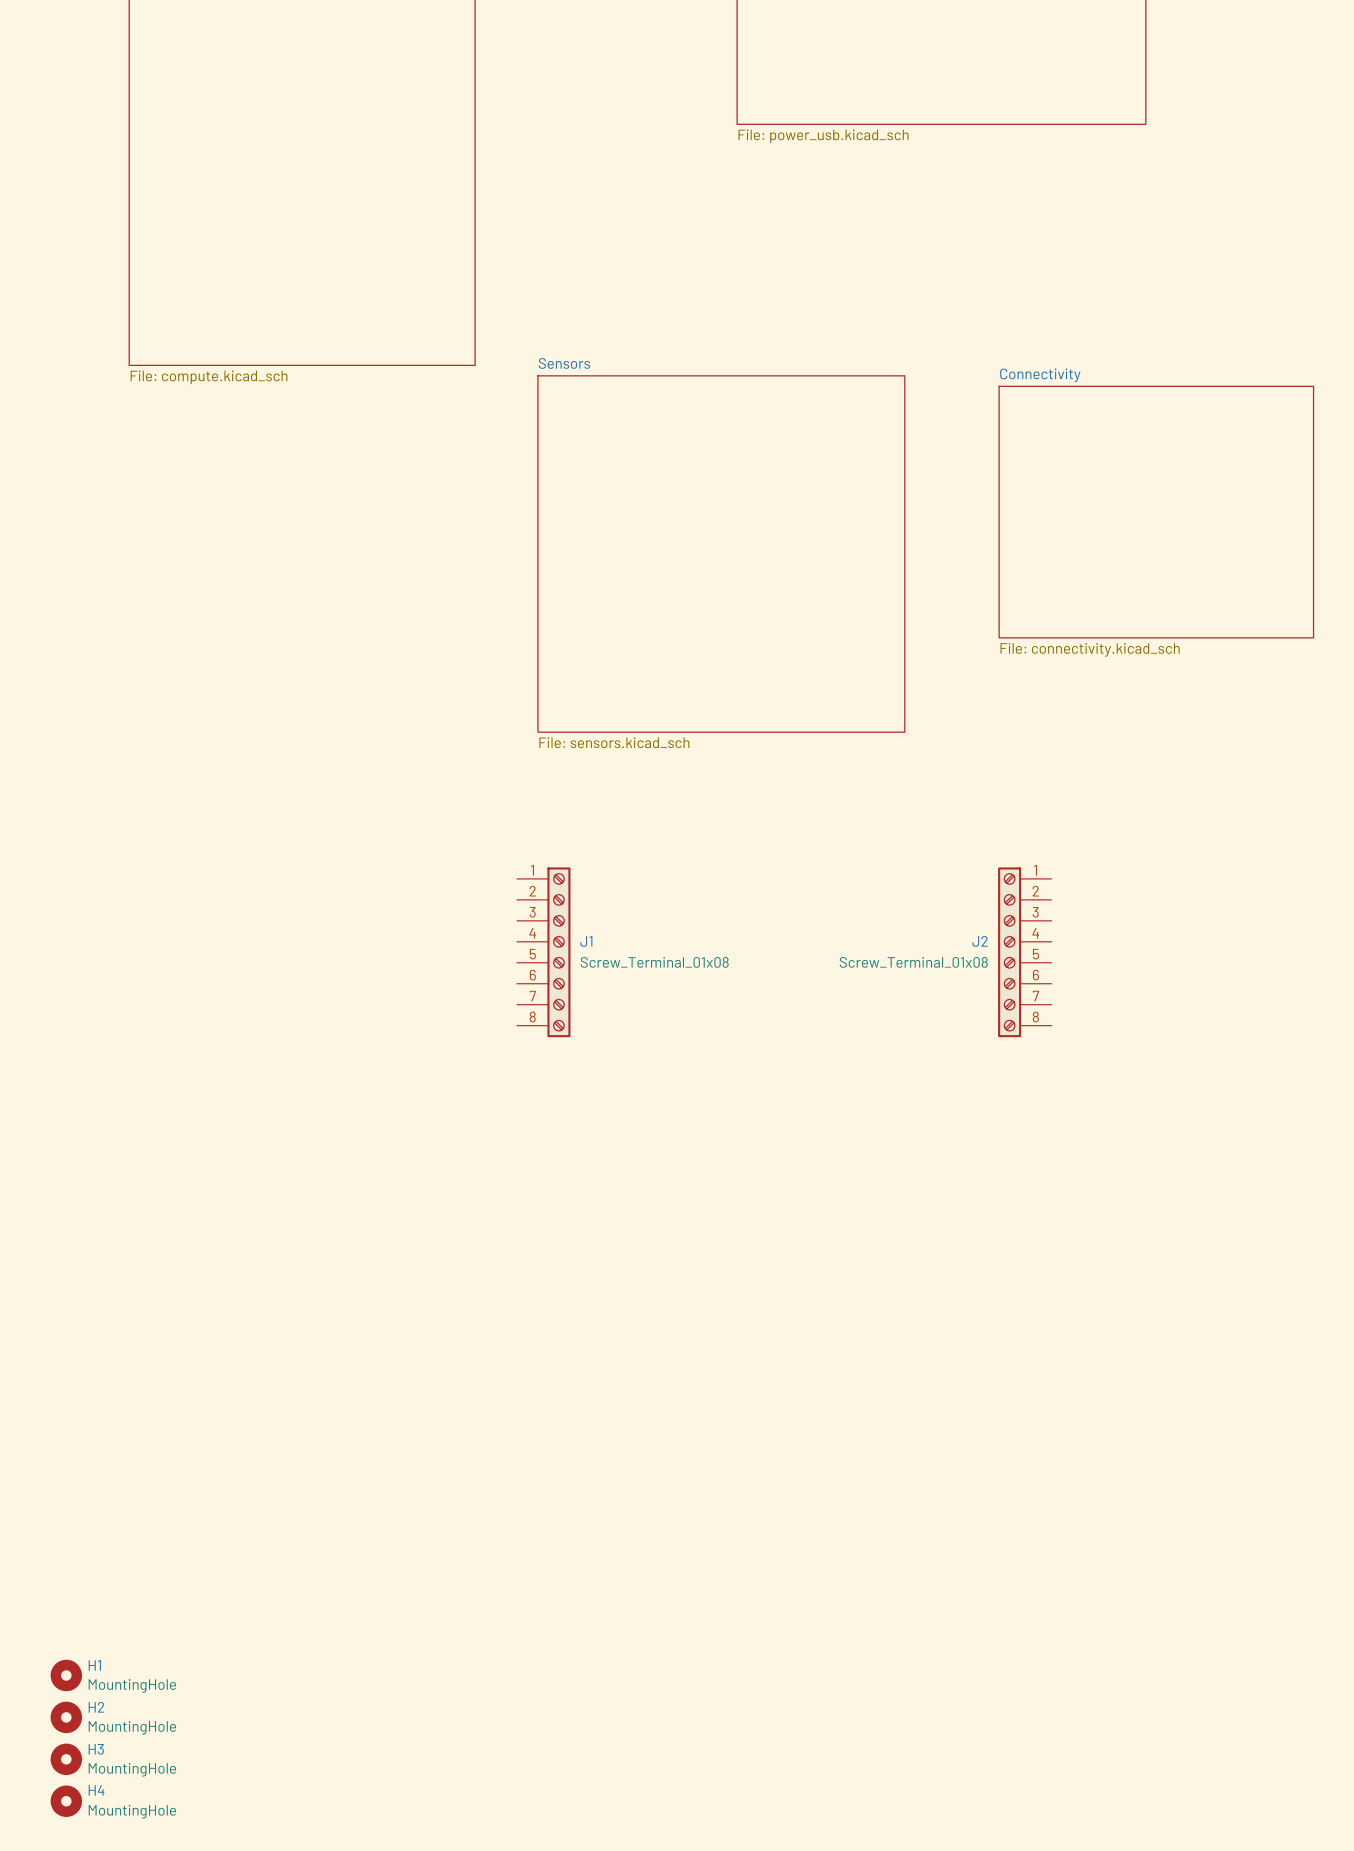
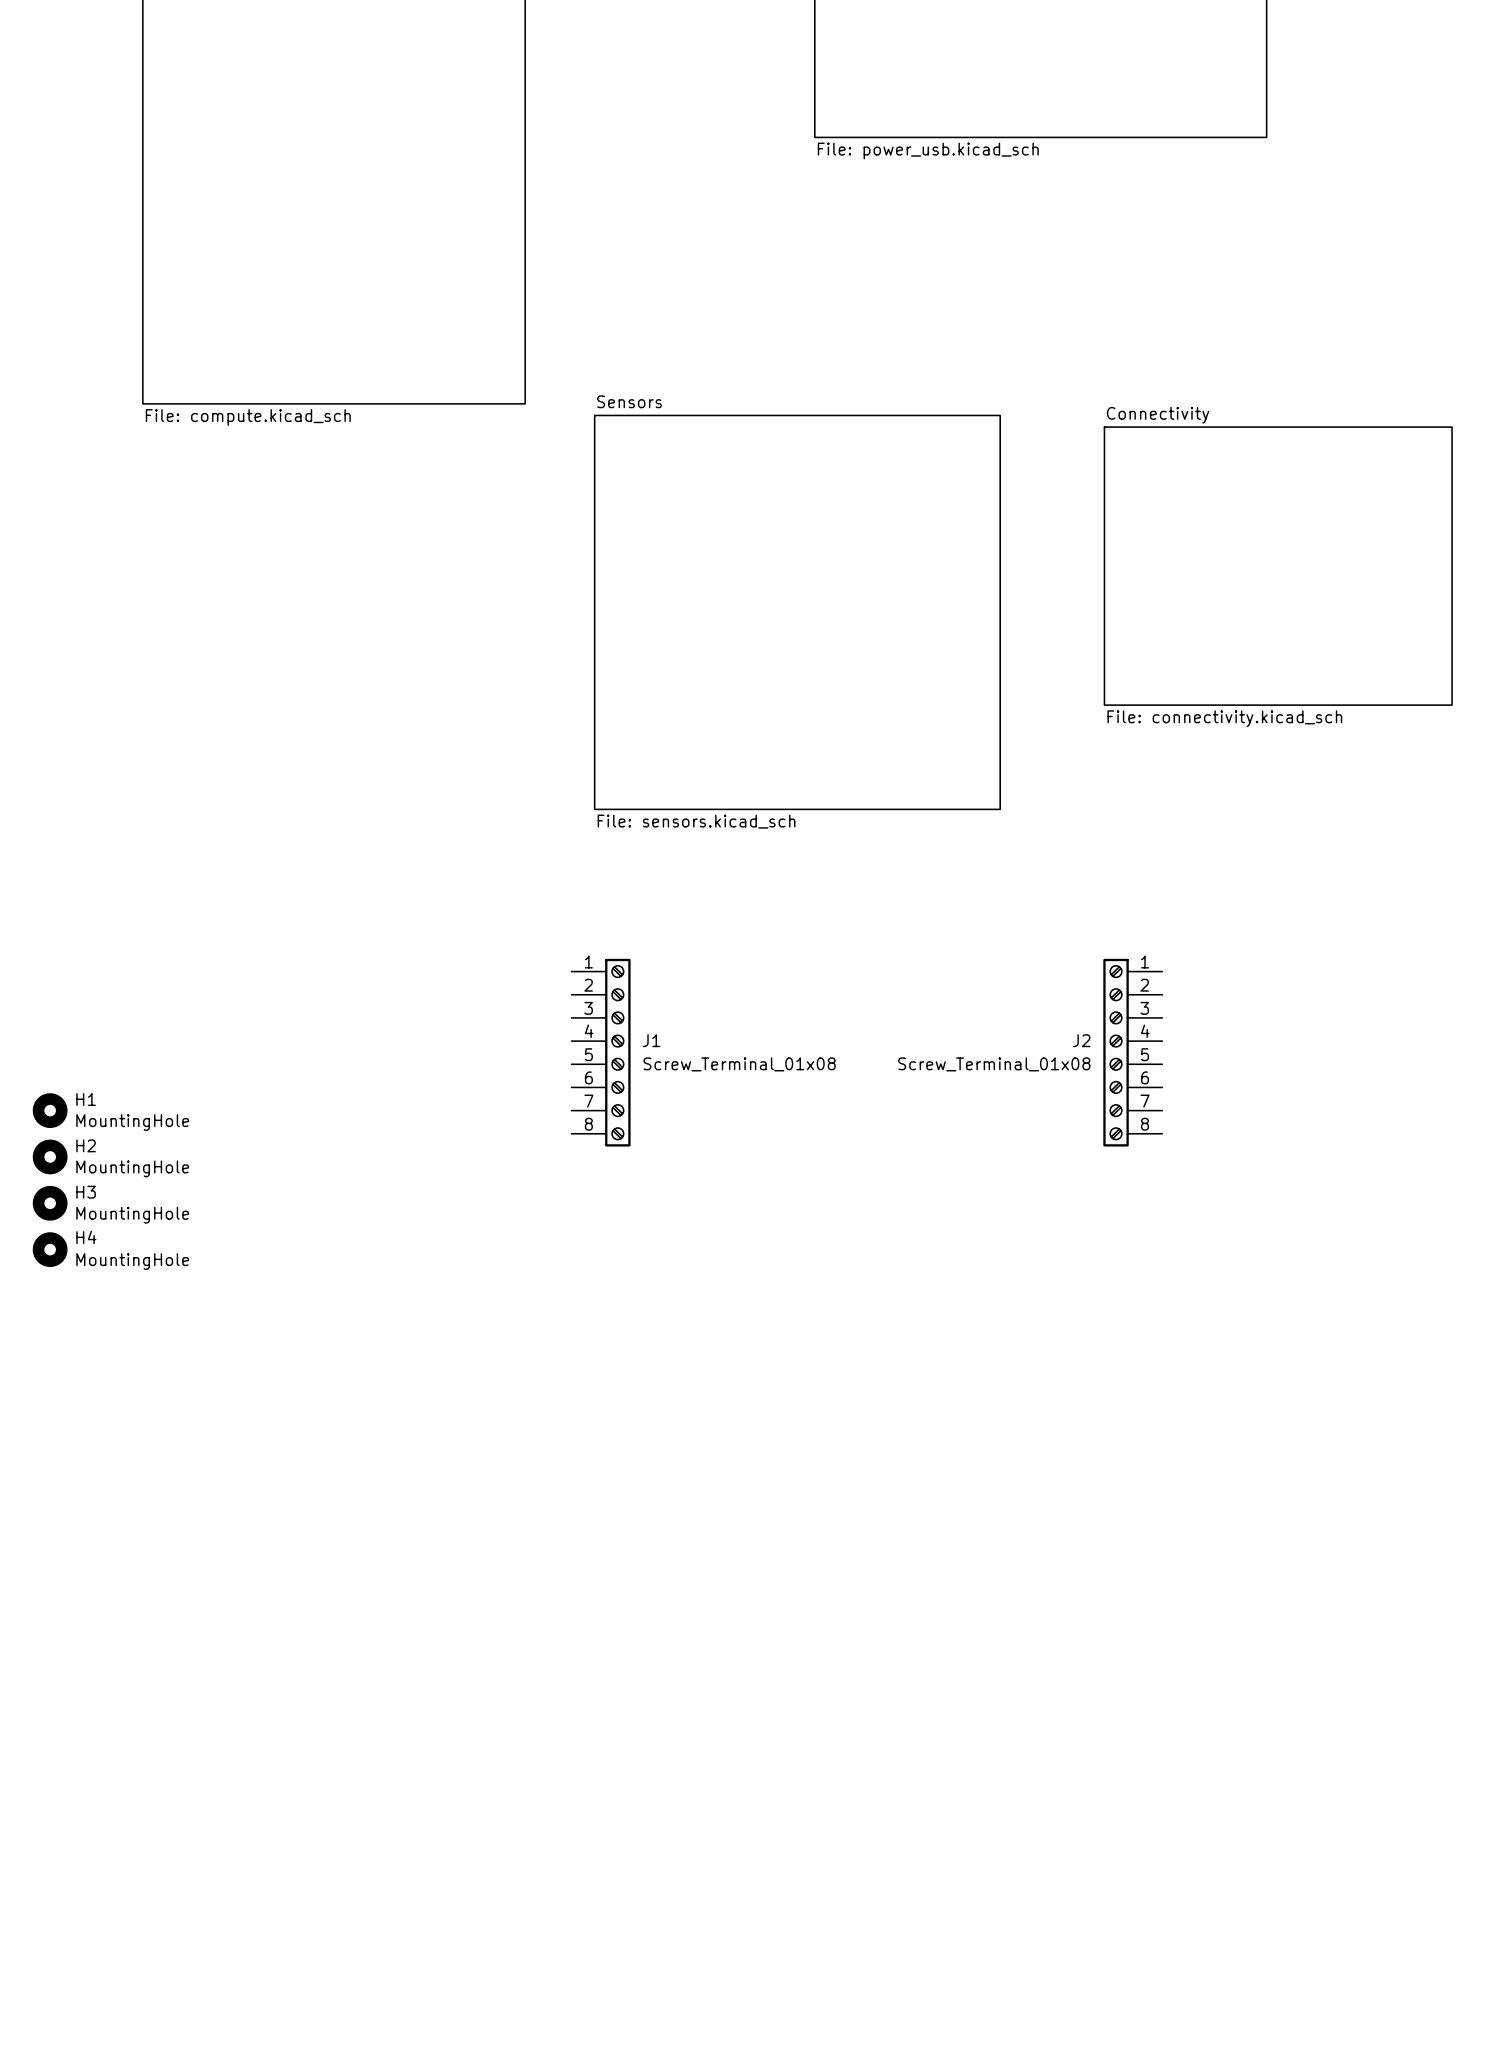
H1 position: (66, 1675) -> (50, 1110)
H2 position: (66, 1717) -> (50, 1156)
H3 position: (66, 1759) -> (50, 1203)
H4 position: (66, 1801) -> (50, 1249)

